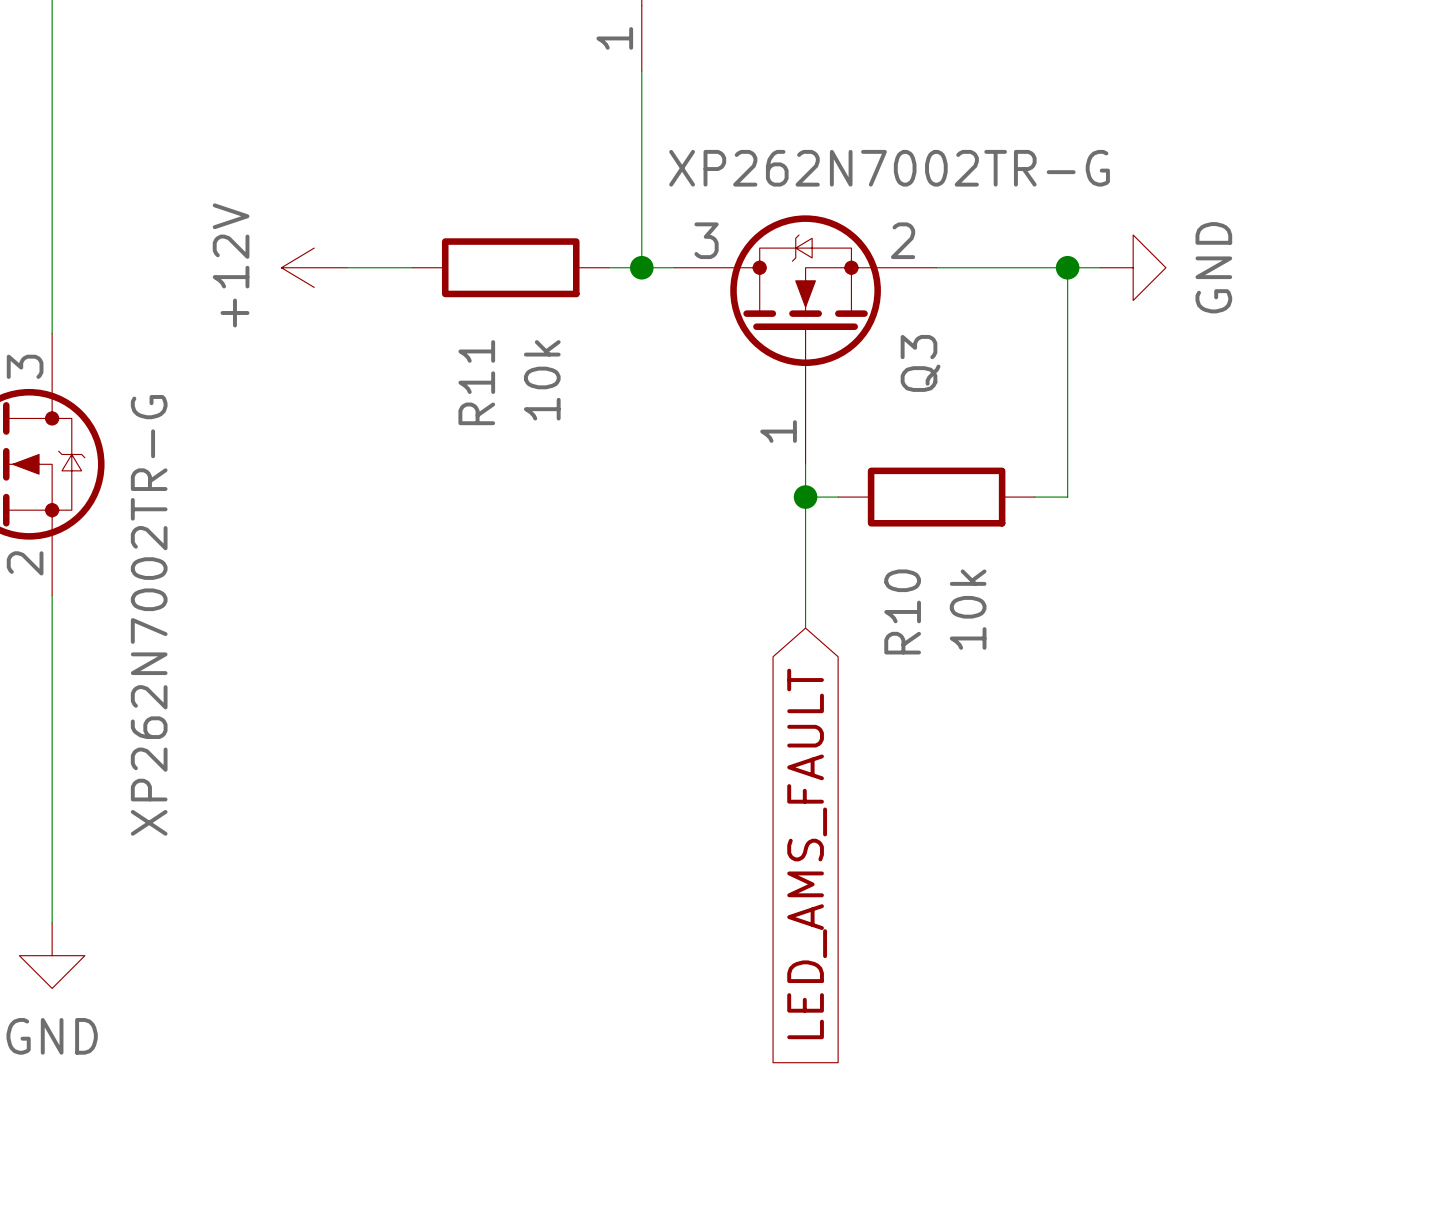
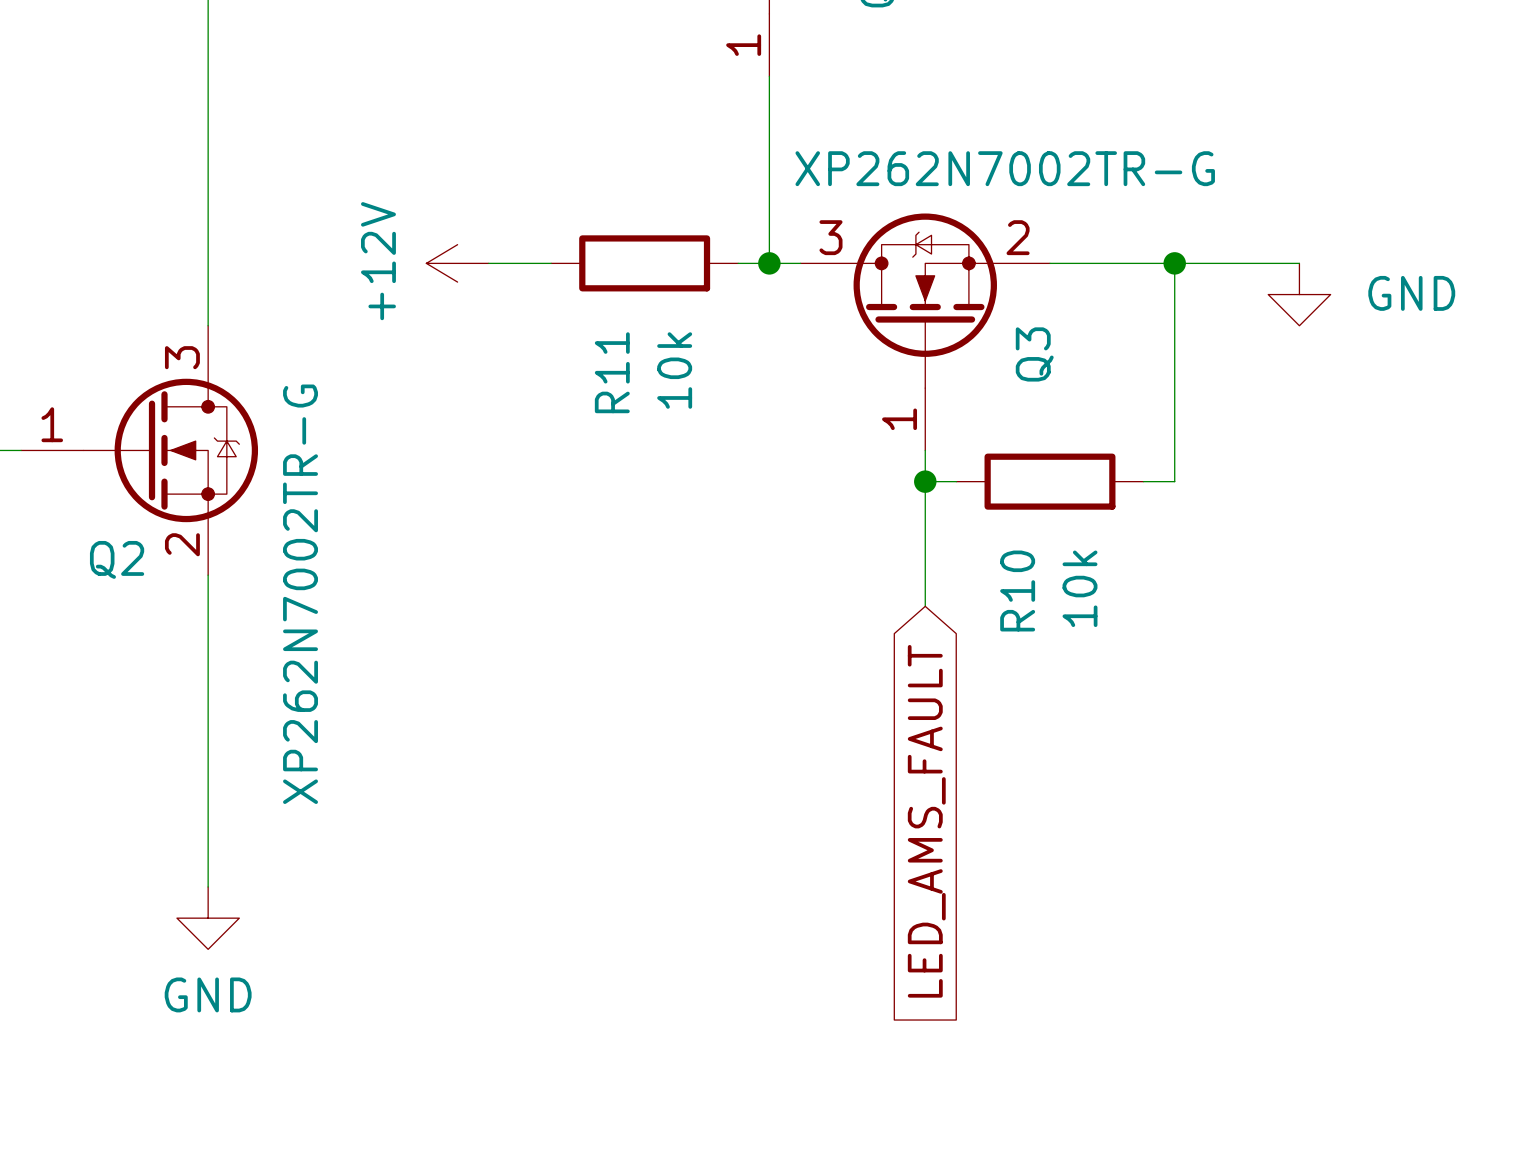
wire: none -> (1205, 263) (1299, 263)
power symbol rotation: 0° (1133, 267) -> 90° clockwise (1299, 294)
power symbol position: GND (1133, 267) -> GND (1299, 294)

